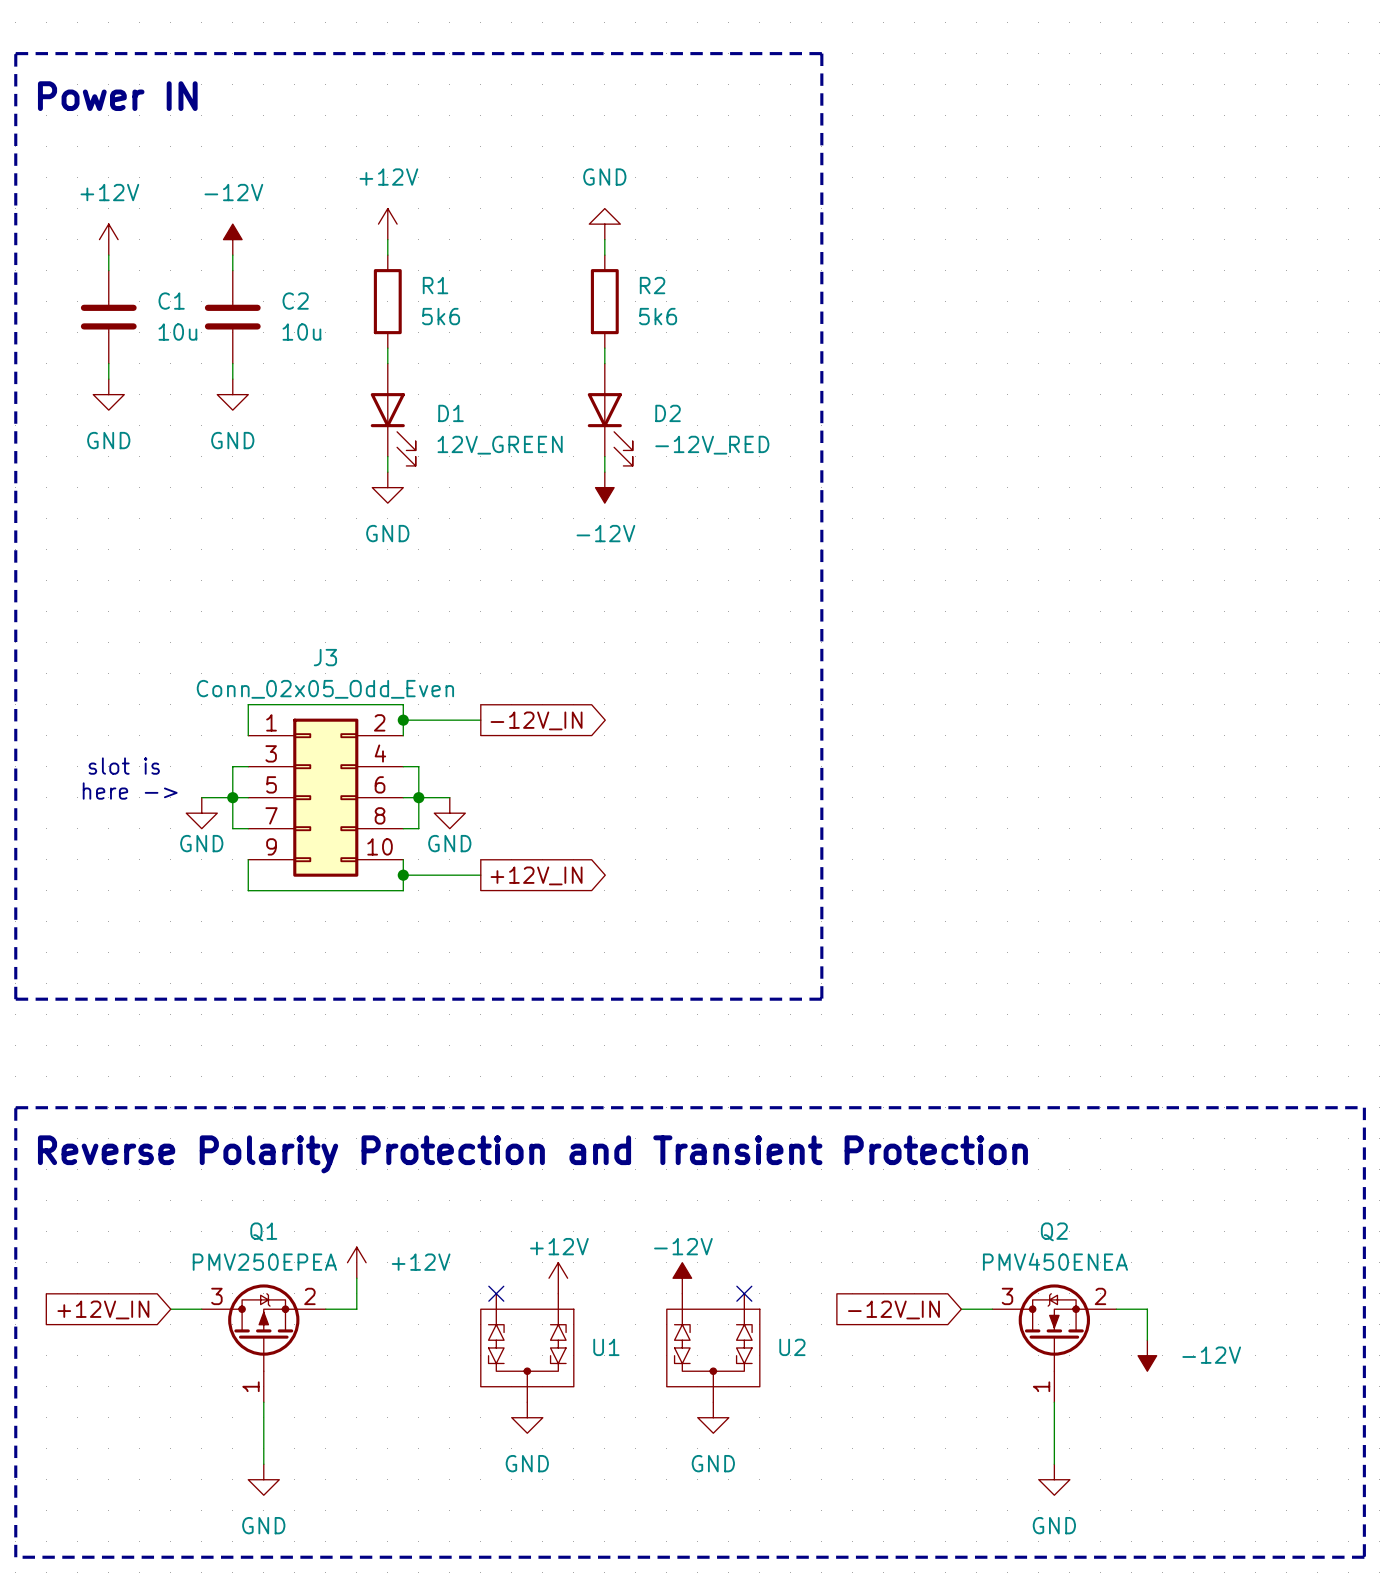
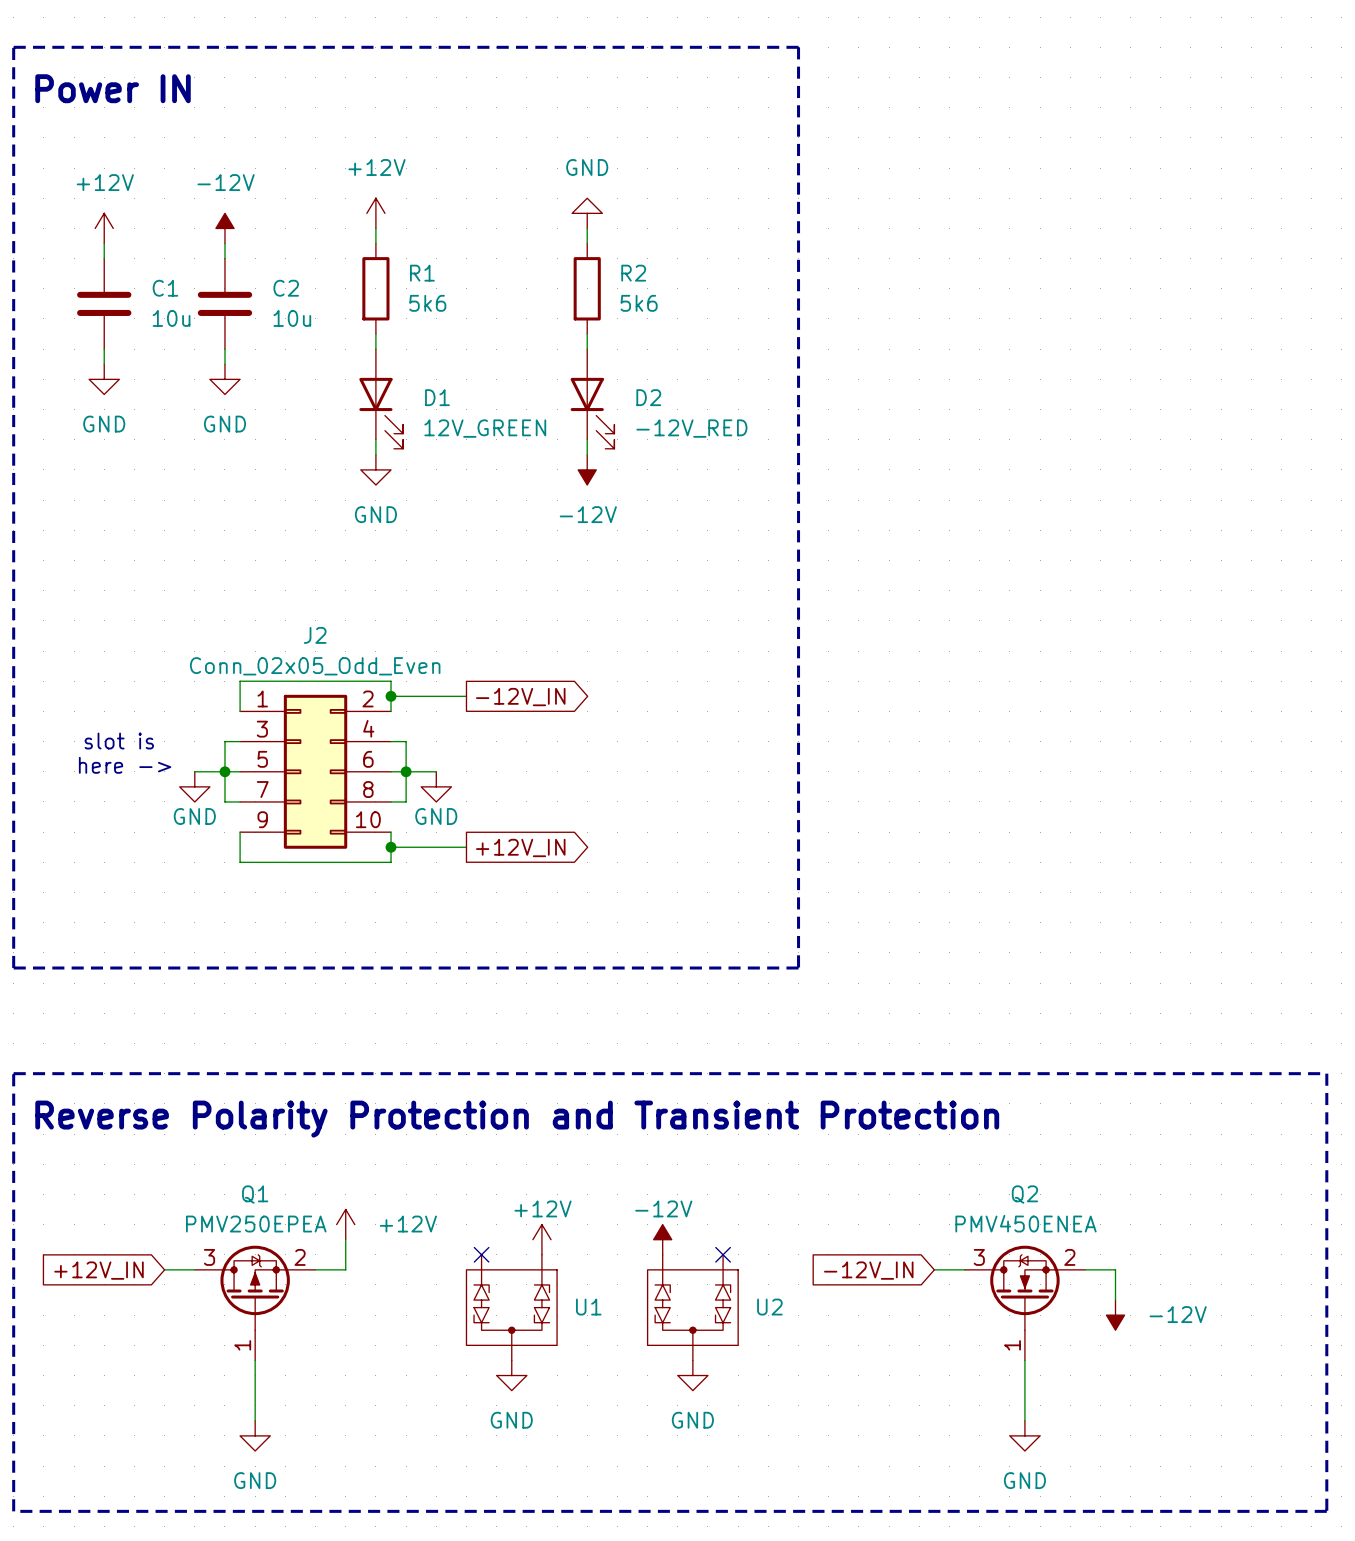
J3 name: J3 (325, 657) -> J2 (315, 635)

